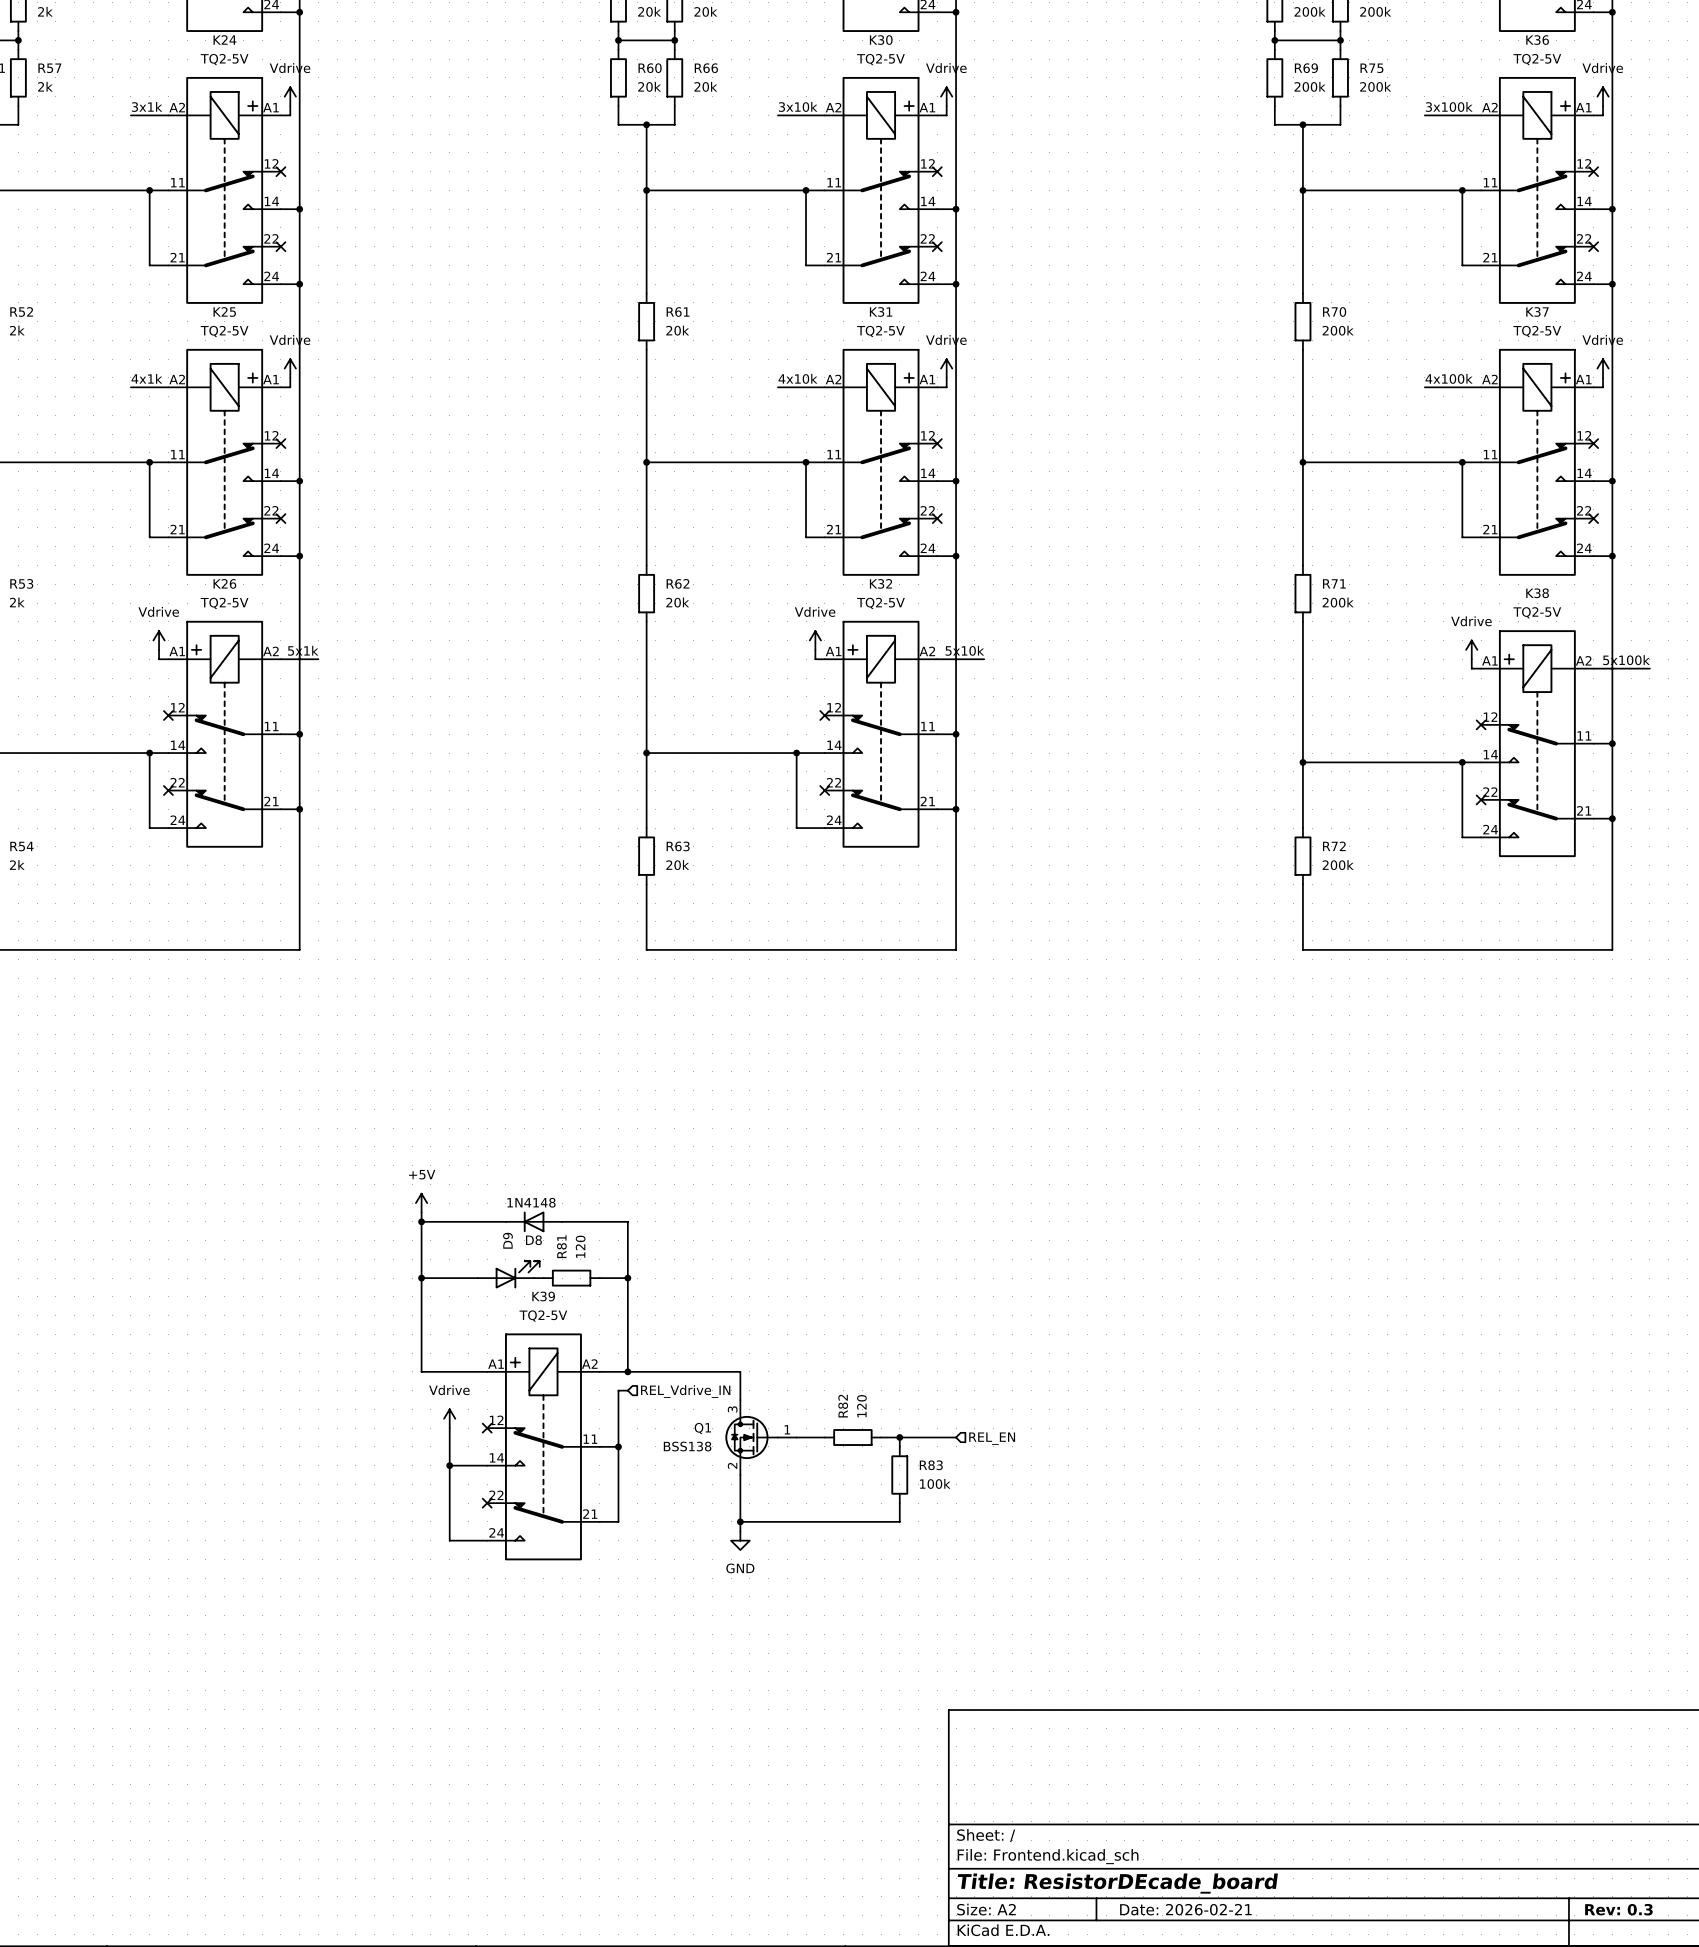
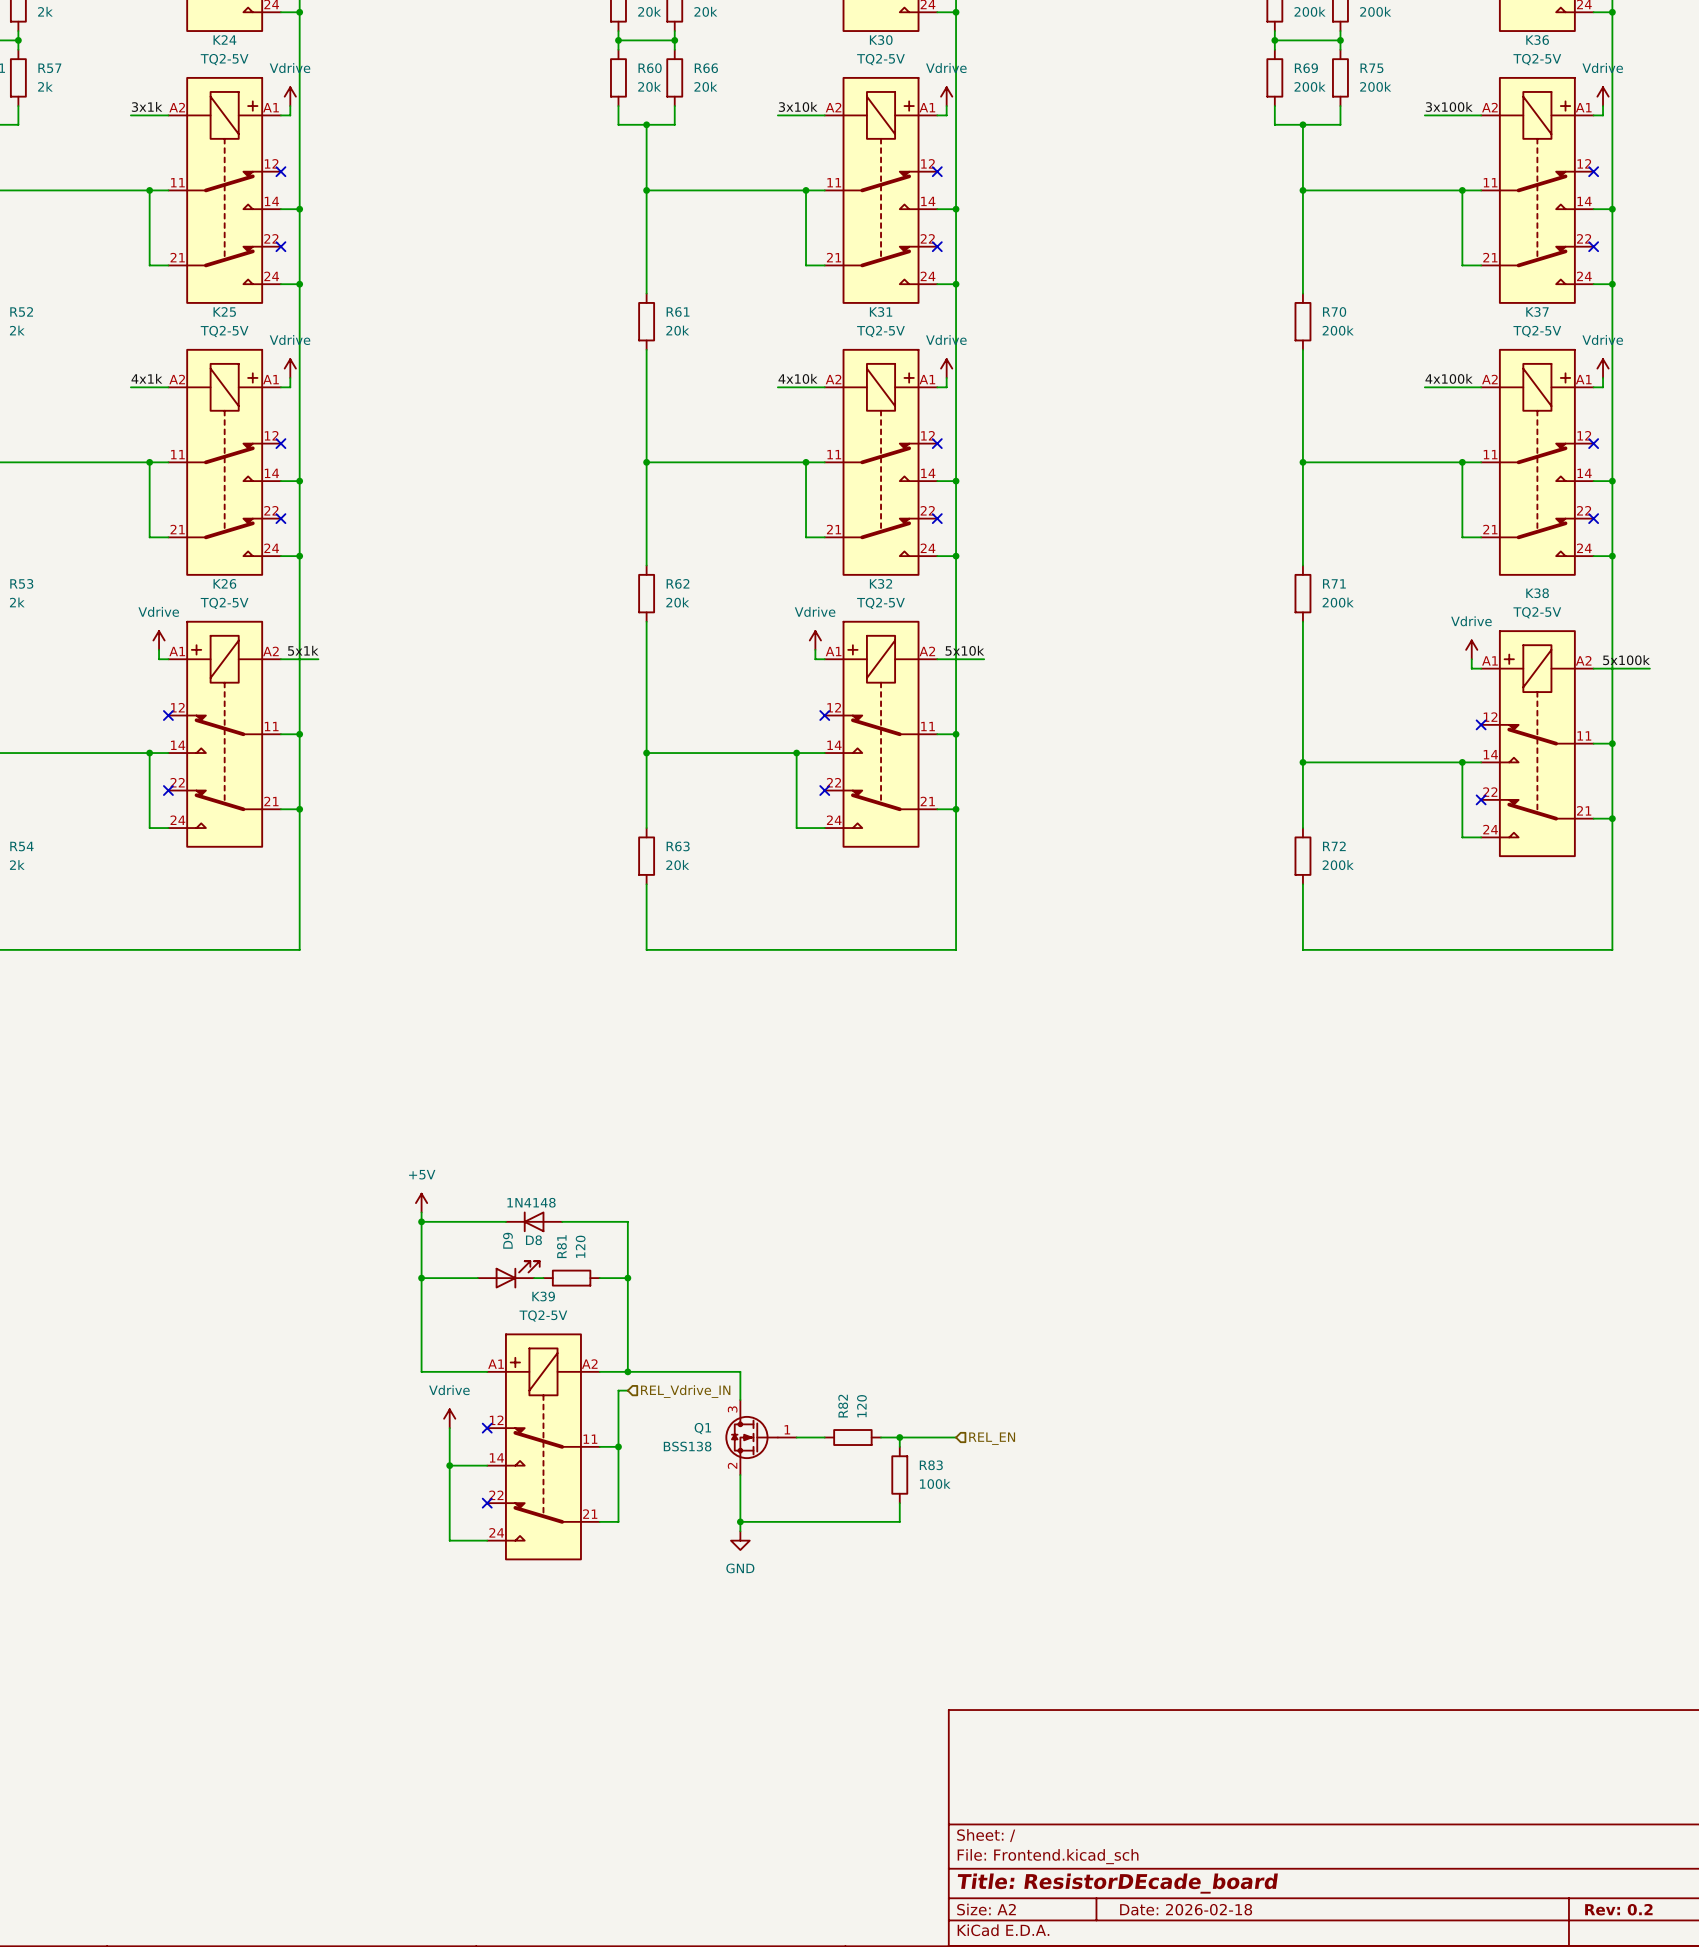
title block: Date: 2026-02-21 (1185, 1909) -> Date: 2026-02-18 (1186, 1909)
title block: Rev: 0.3 (1618, 1909) -> Rev: 0.2 (1618, 1909)

